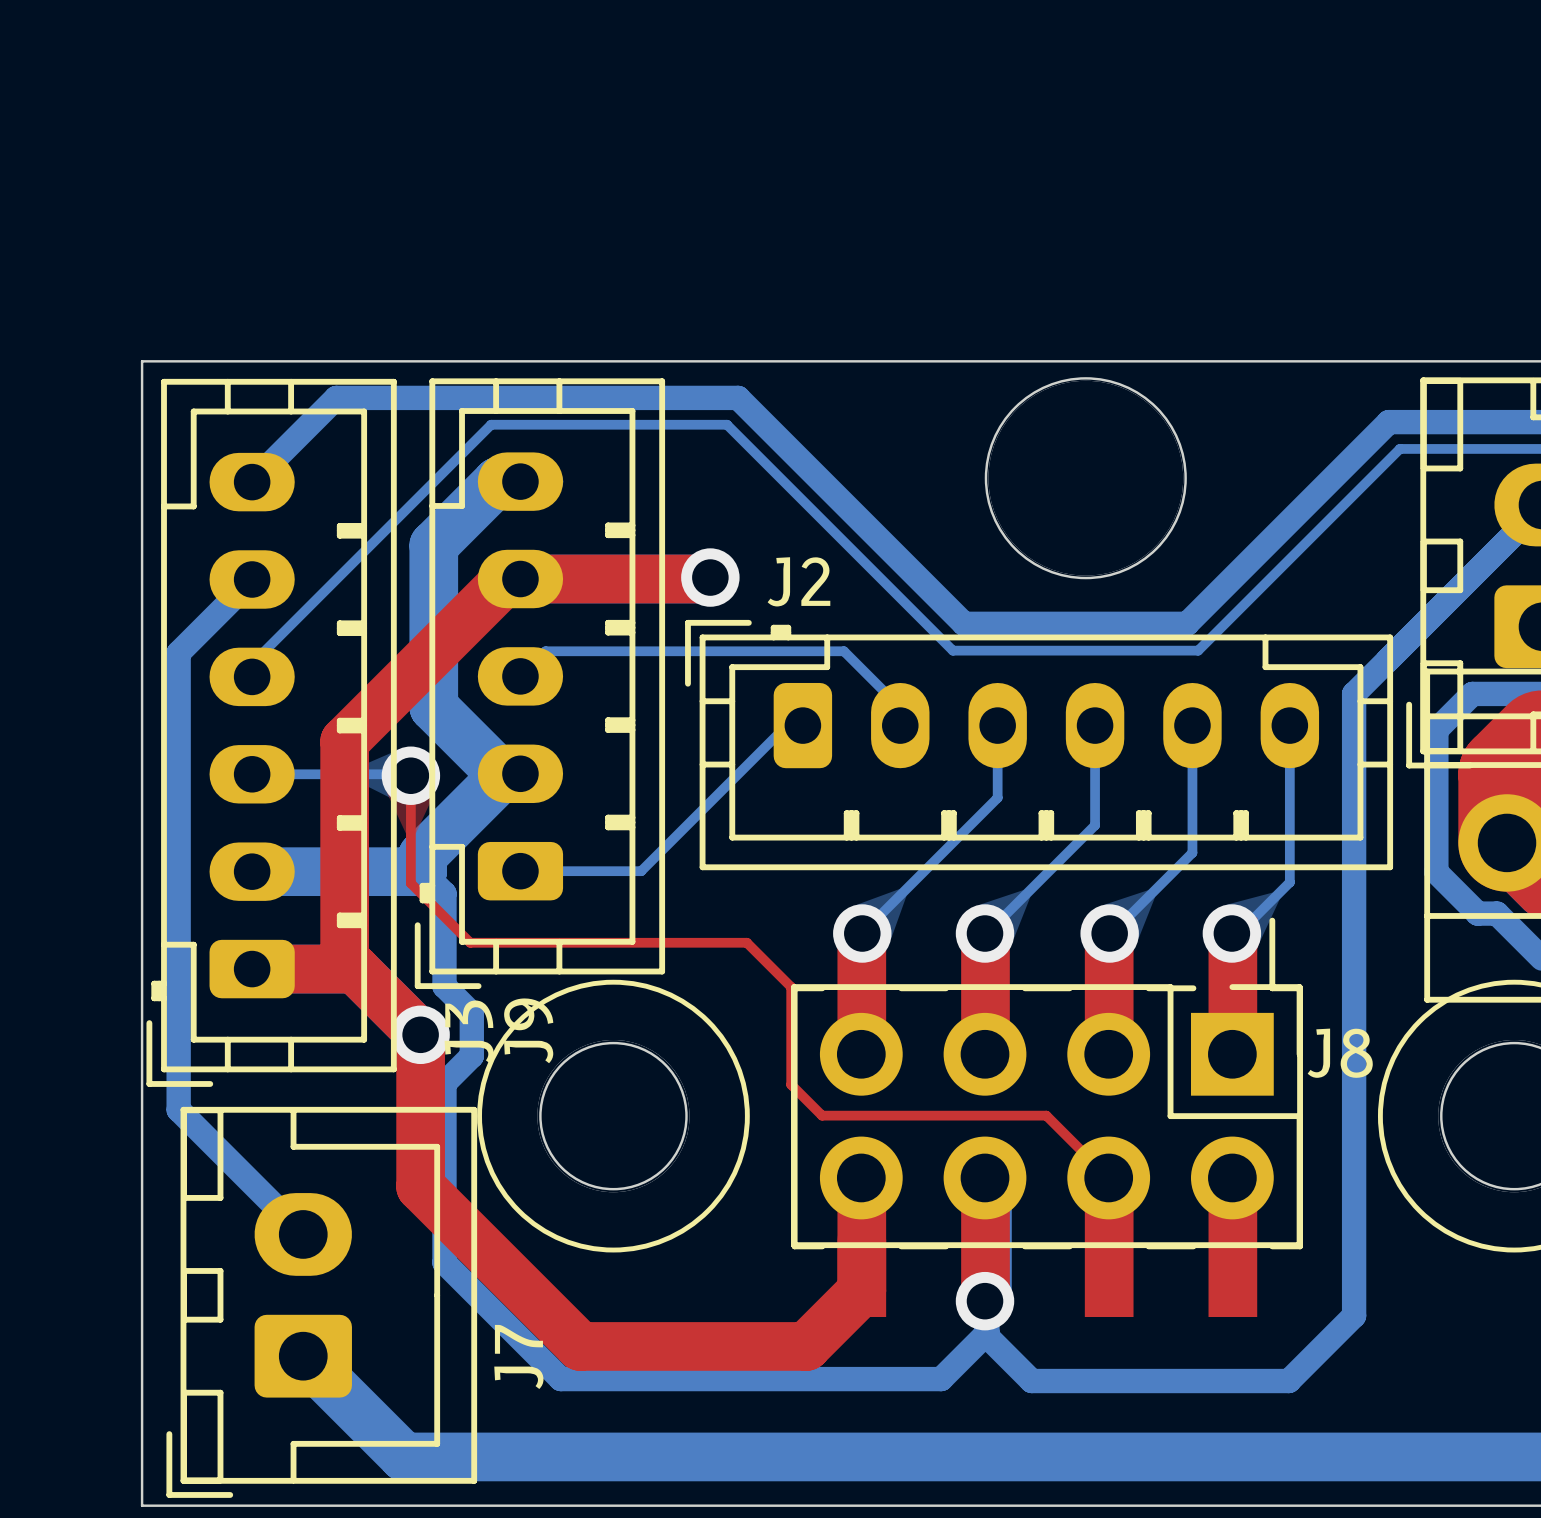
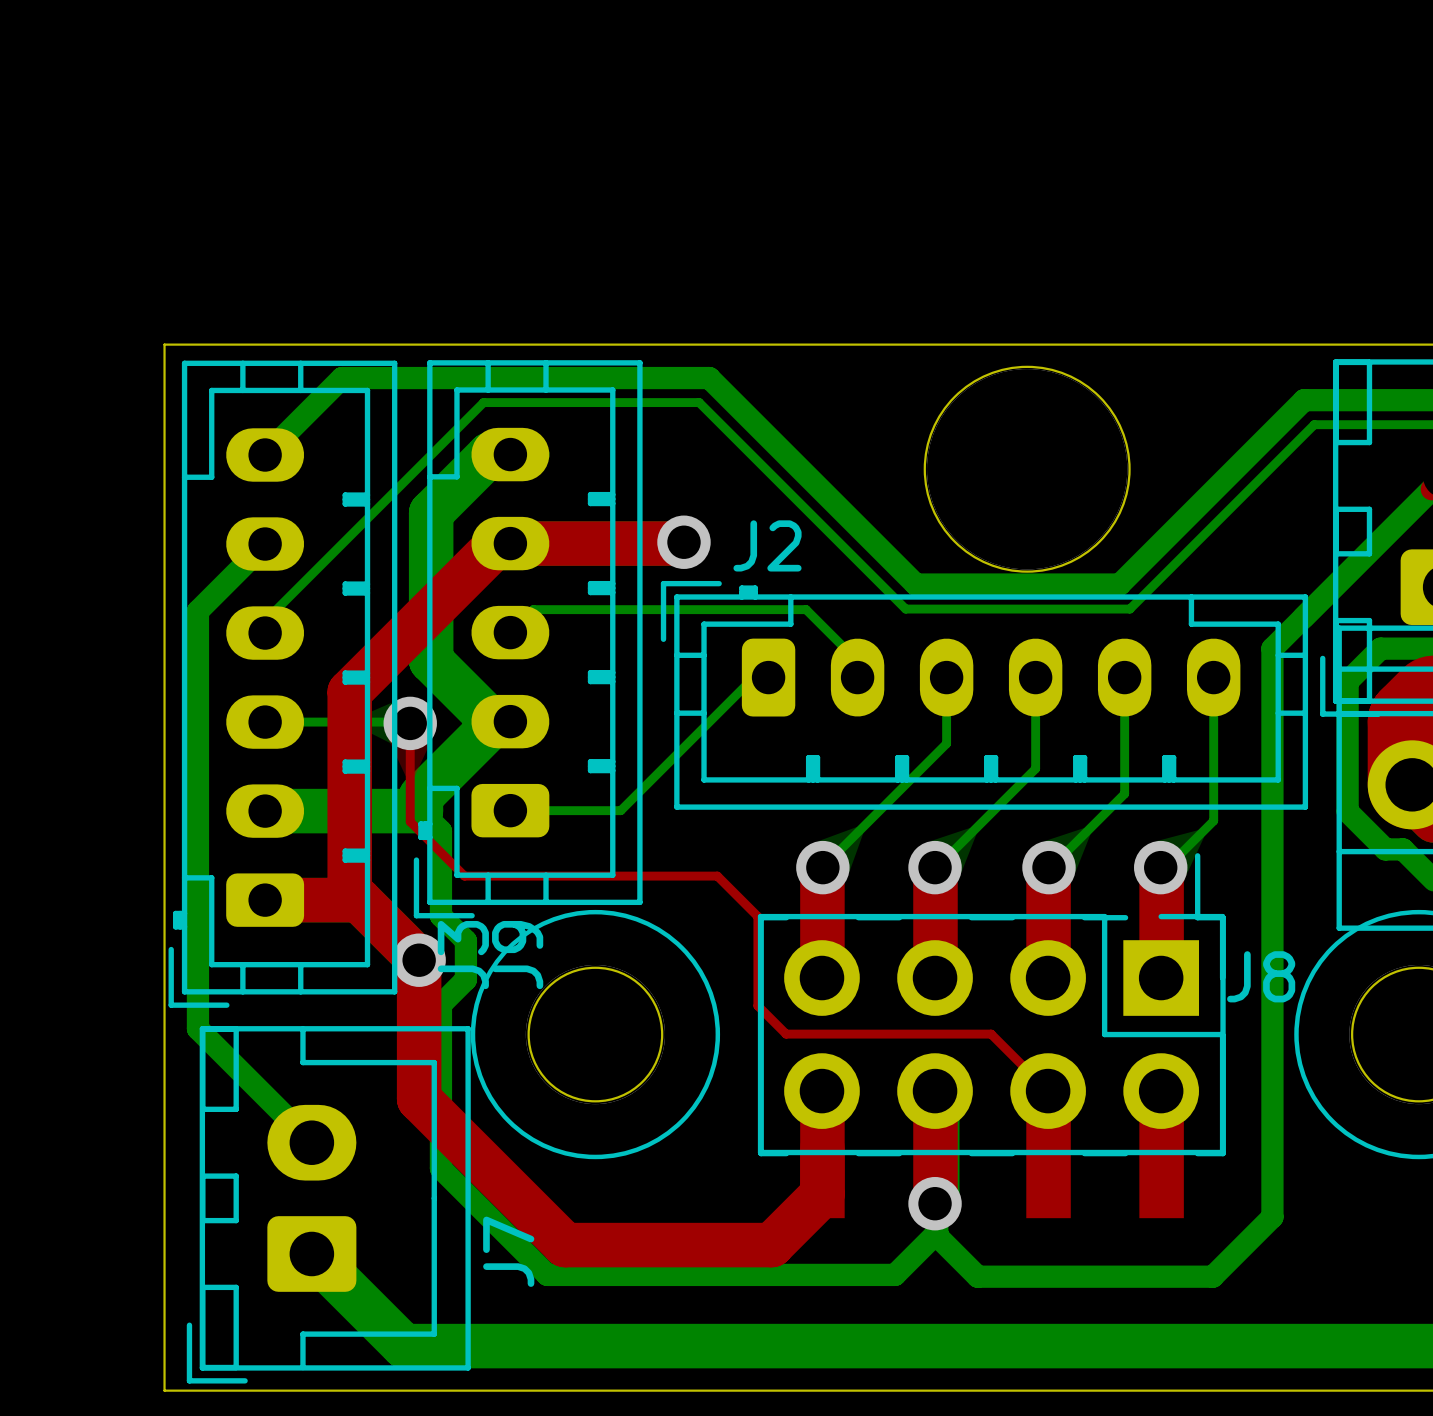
round board edge size: [984, 377, 1187, 580] -> [923, 365, 1131, 573]

